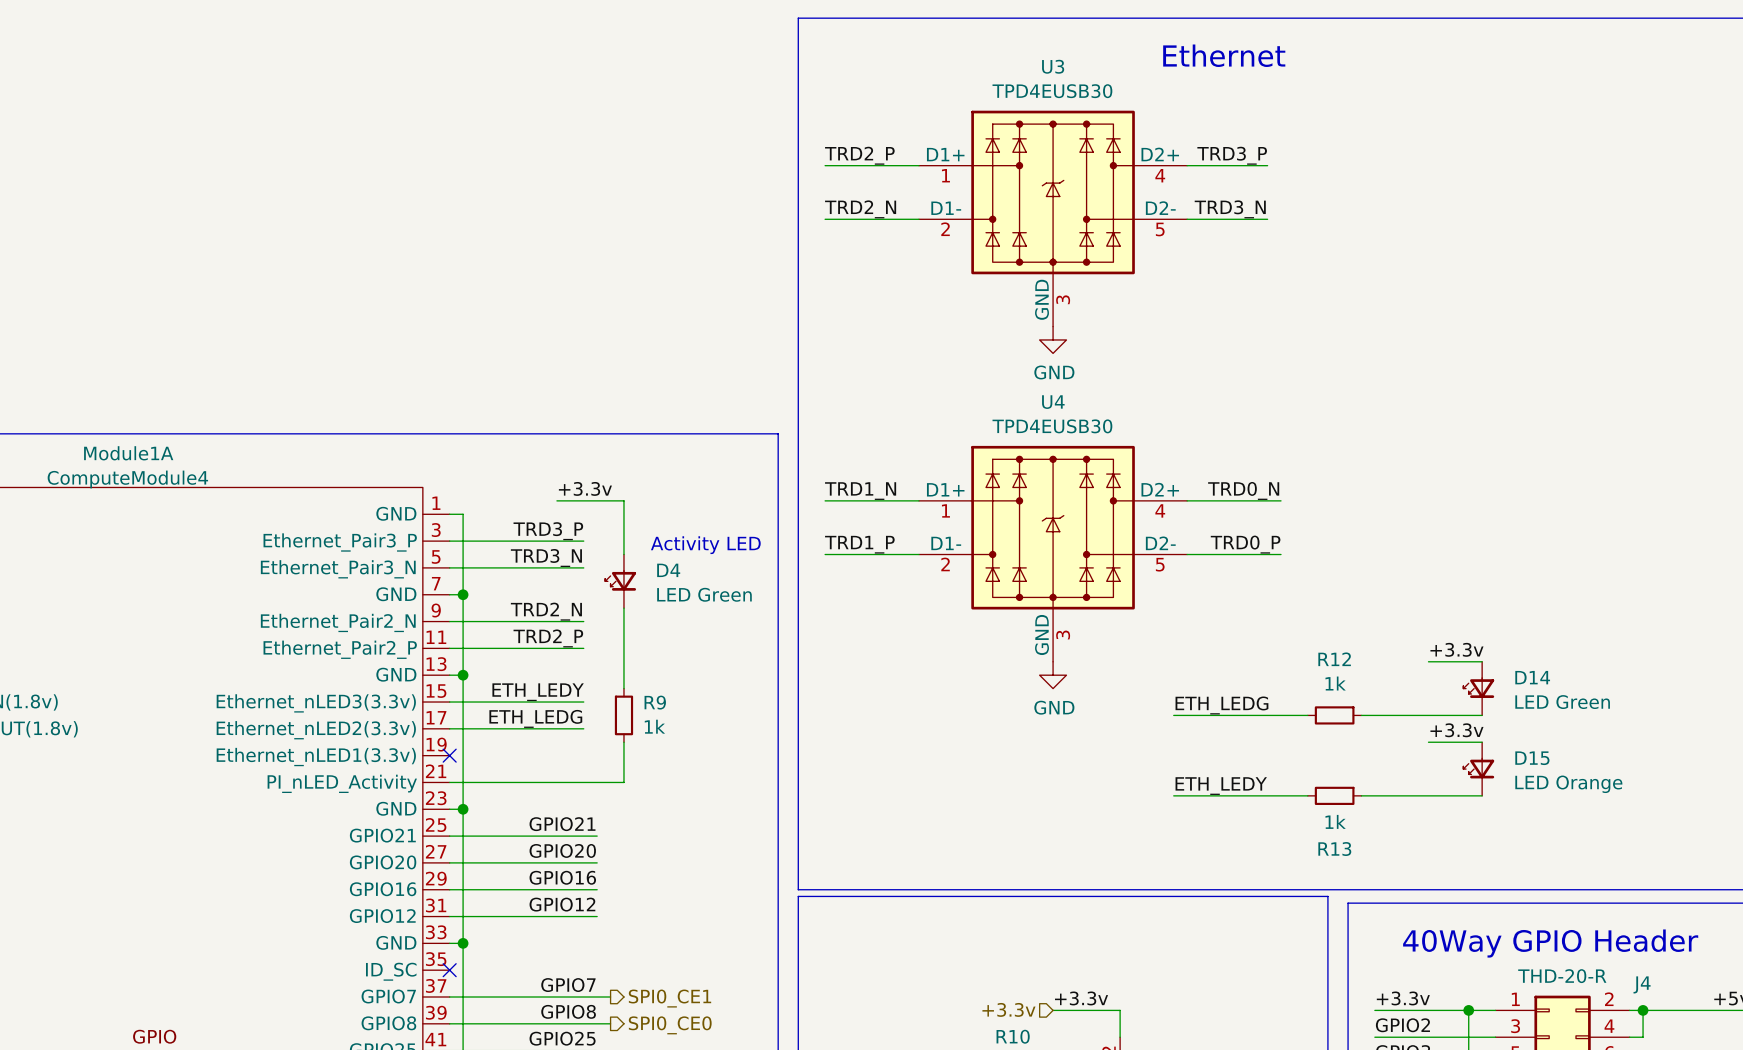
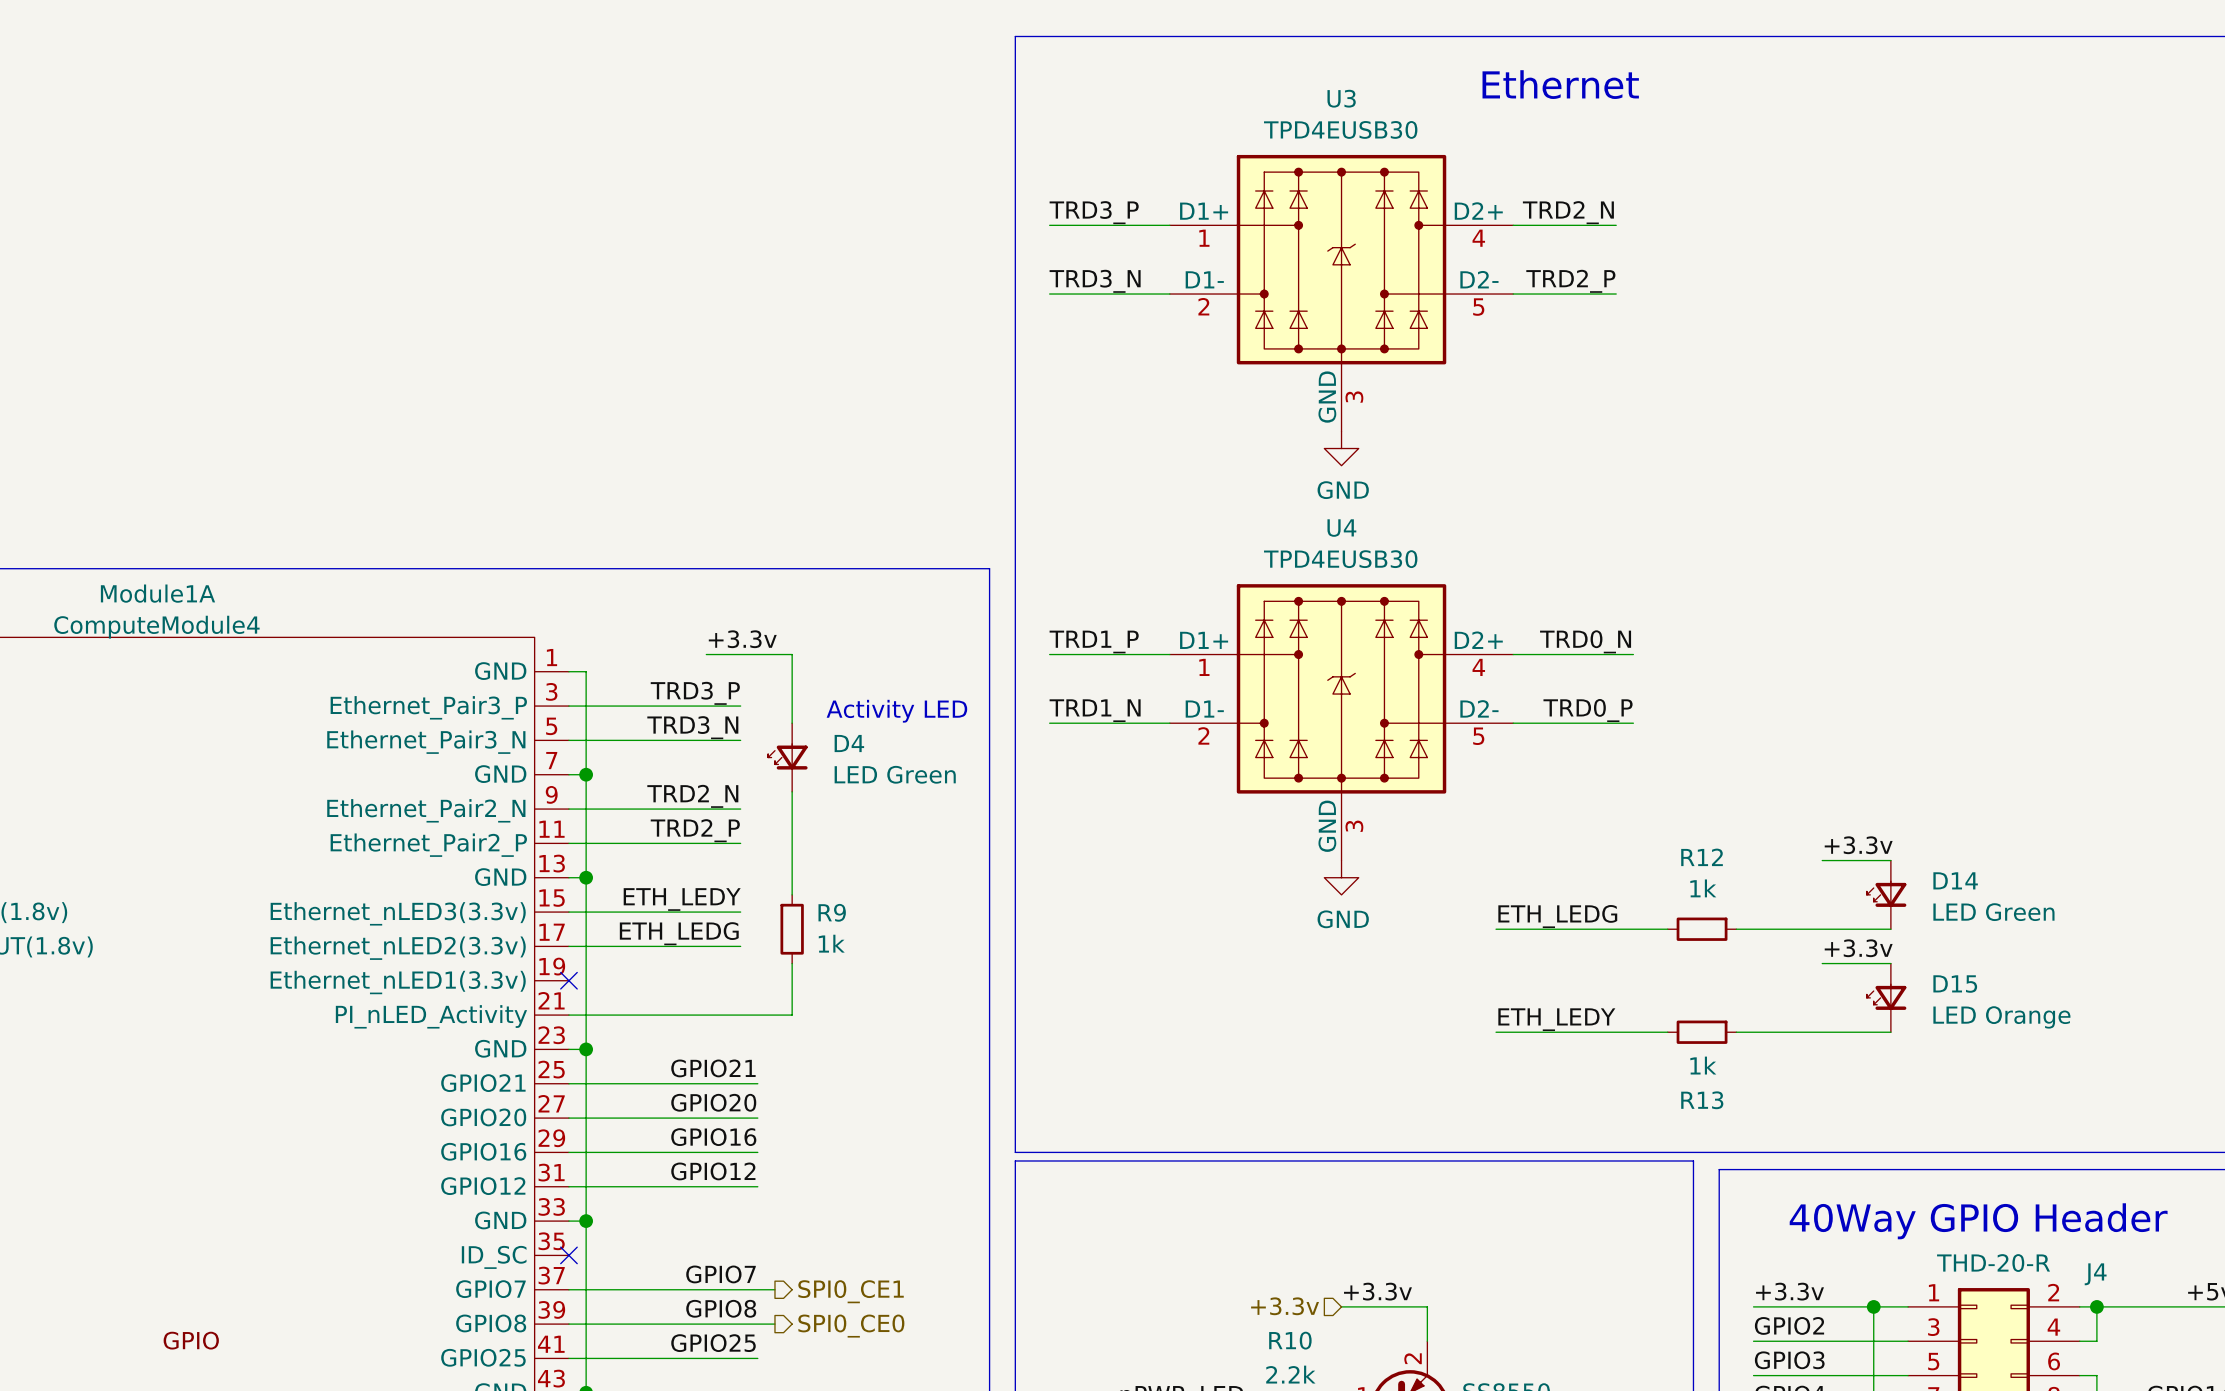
label: TRD2_P (859, 155) -> TRD3_P (1094, 212)
label: TRD3_P (1232, 155) -> TRD2_N (1568, 212)
label: TRD2_N (860, 209) -> TRD3_N (1095, 281)
label: TRD3_N (1230, 209) -> TRD2_P (1570, 281)
label: TRD1_N (860, 491) -> TRD1_P (1094, 641)
label: TRD1_P (859, 544) -> TRD1_N (1095, 710)

